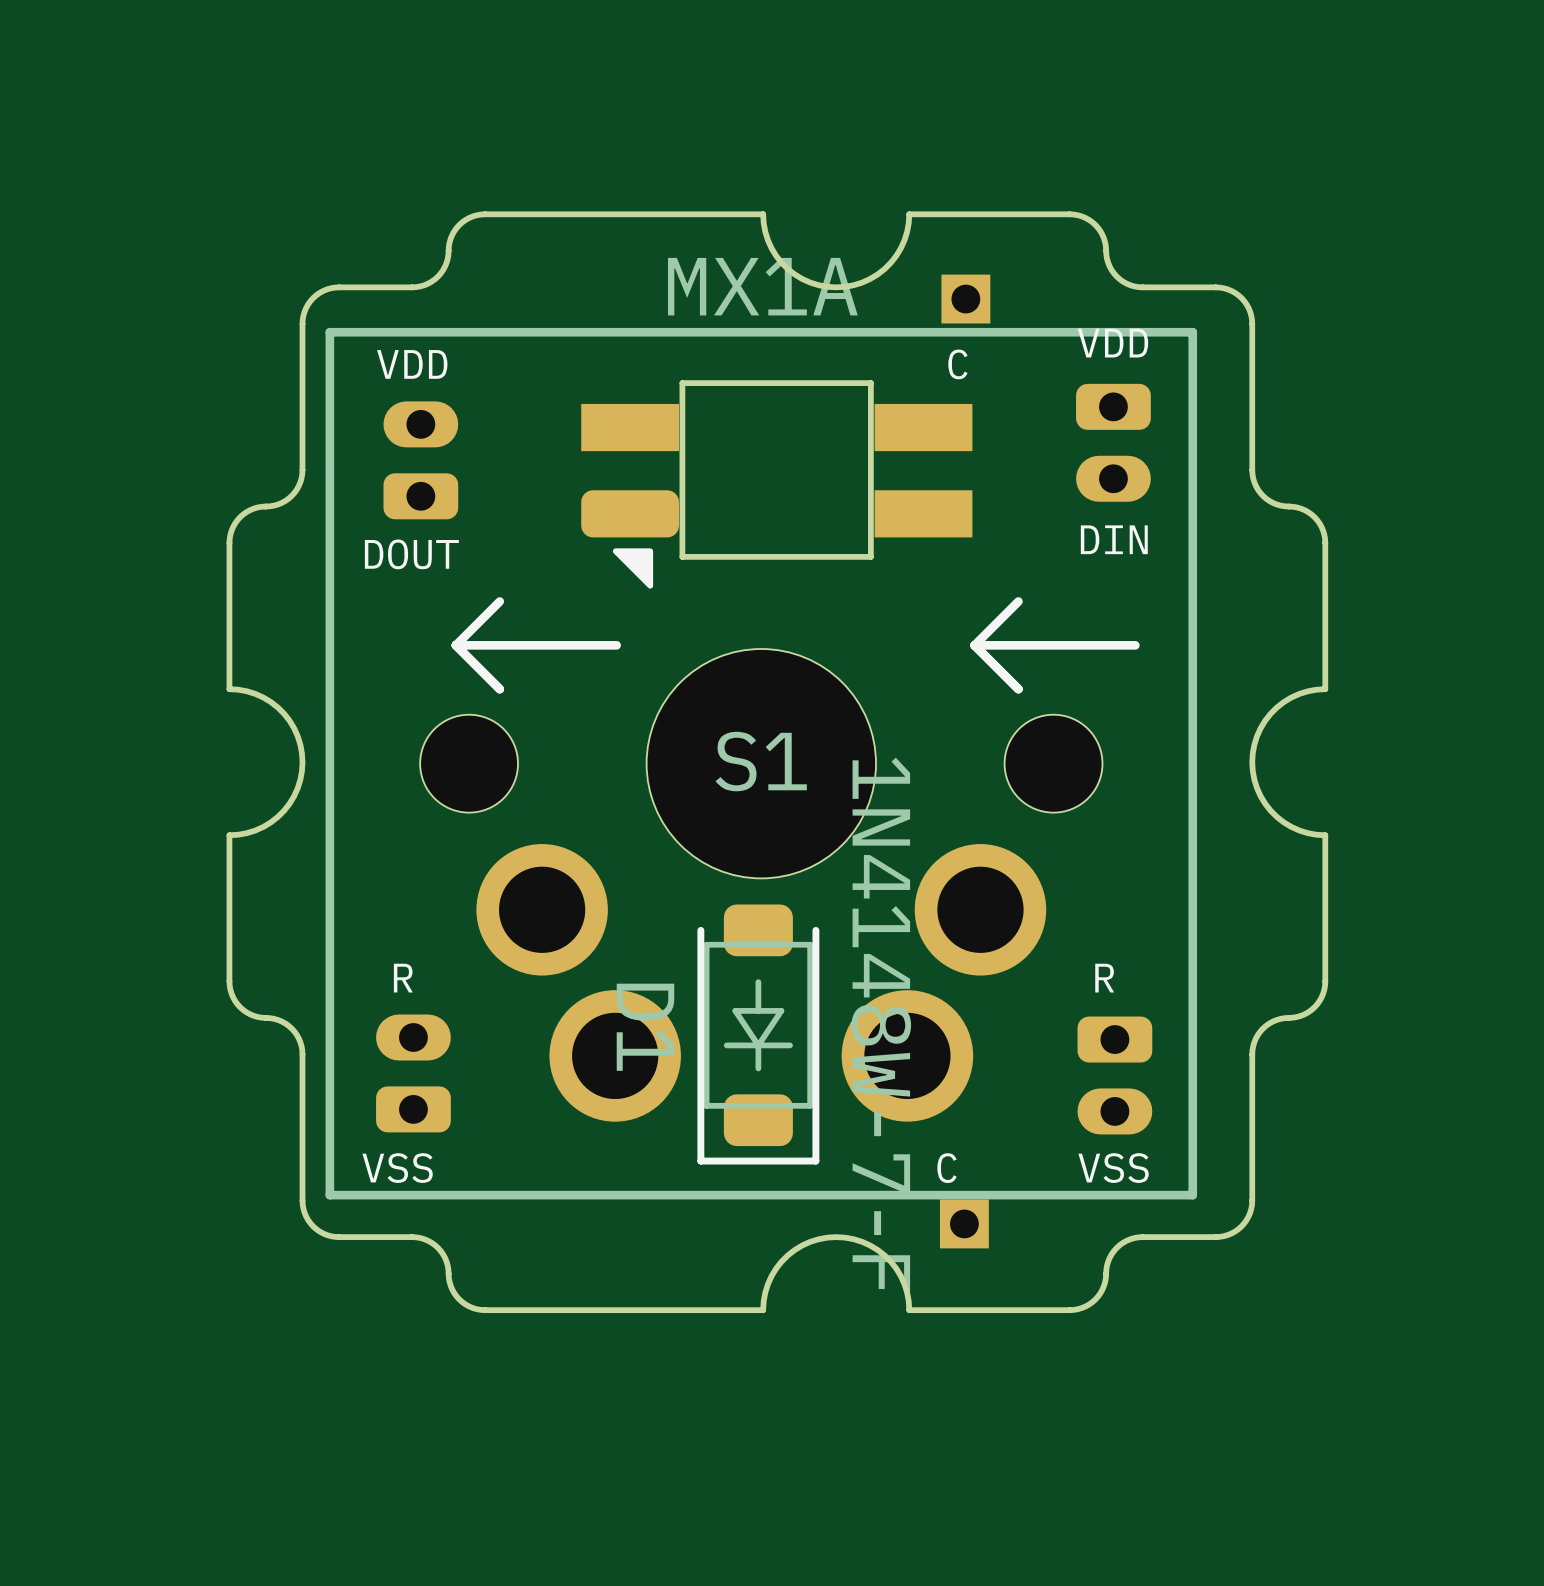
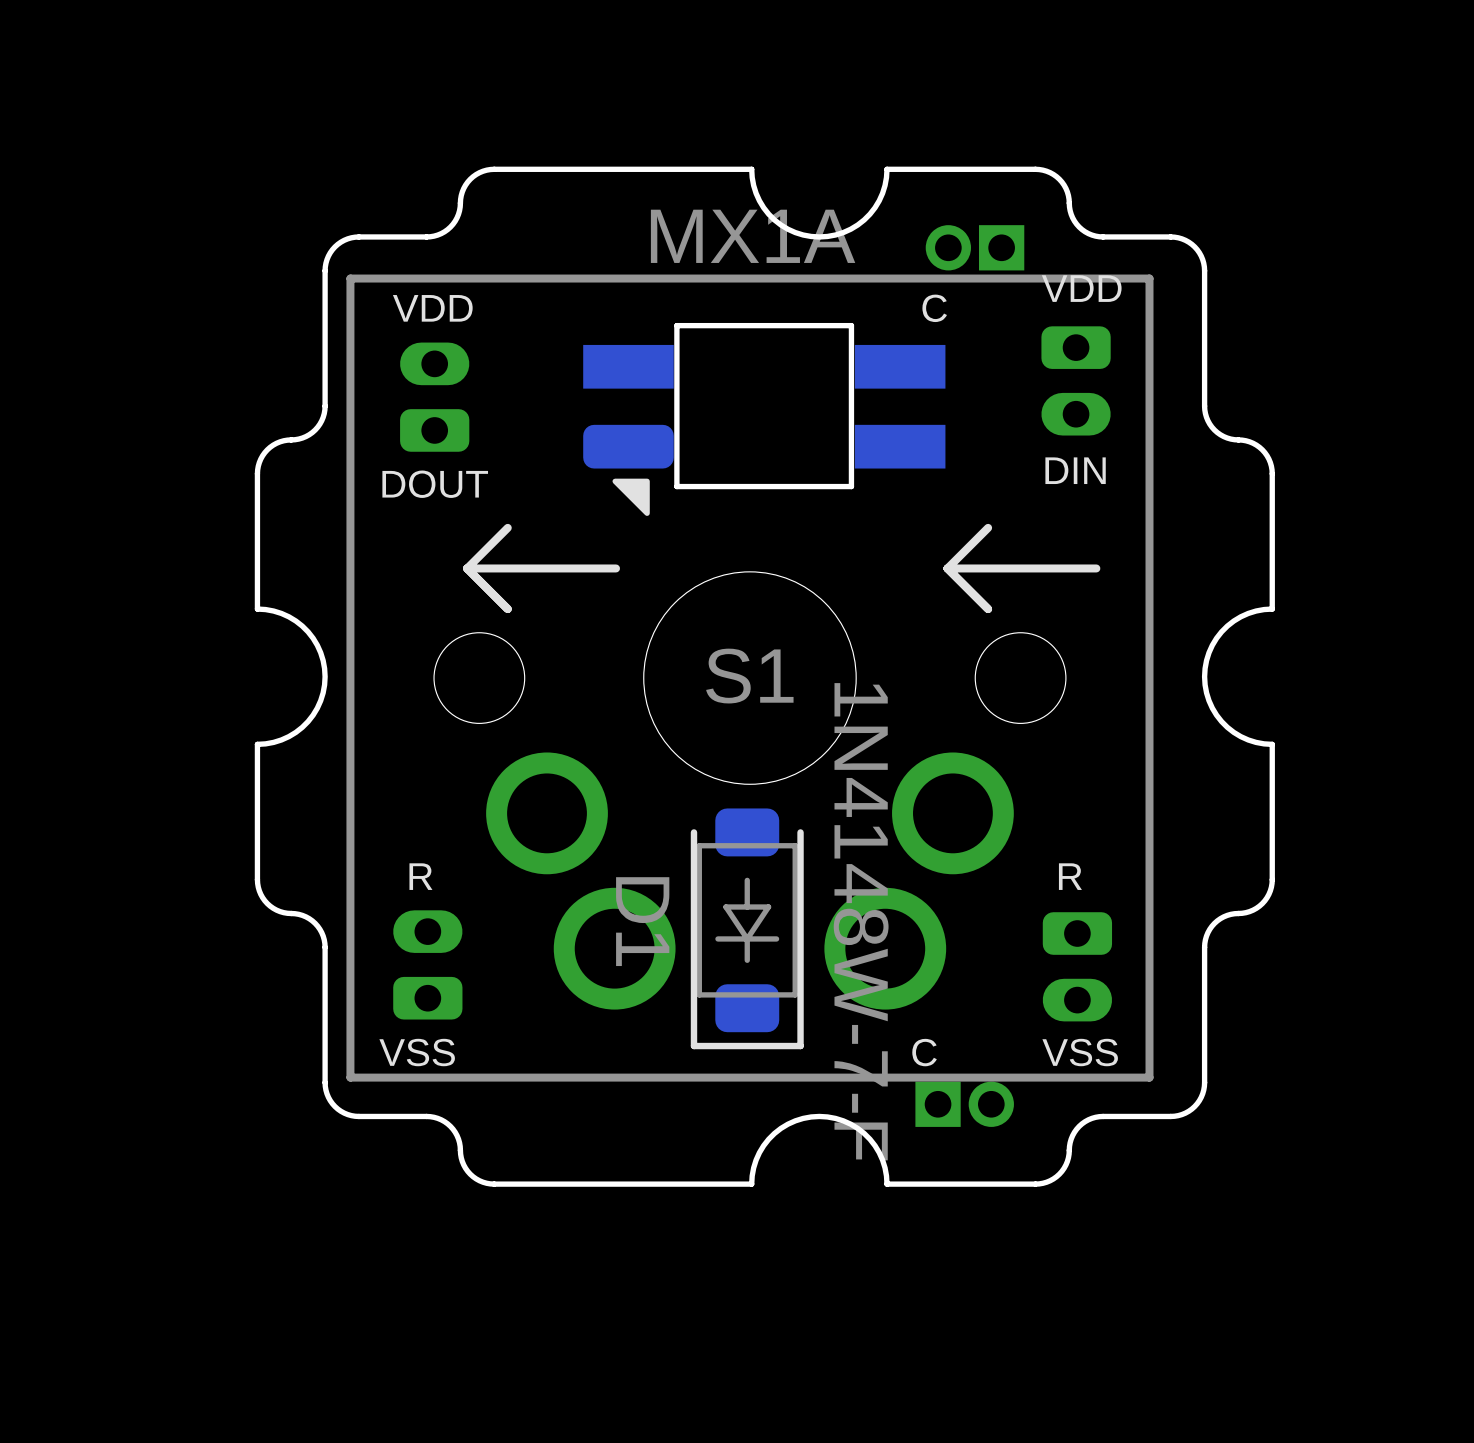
part footprint: [941, 274, 991, 324] -> [925, 225, 1025, 271]
part footprint: [939, 1199, 989, 1249] -> [915, 1081, 1014, 1127]

